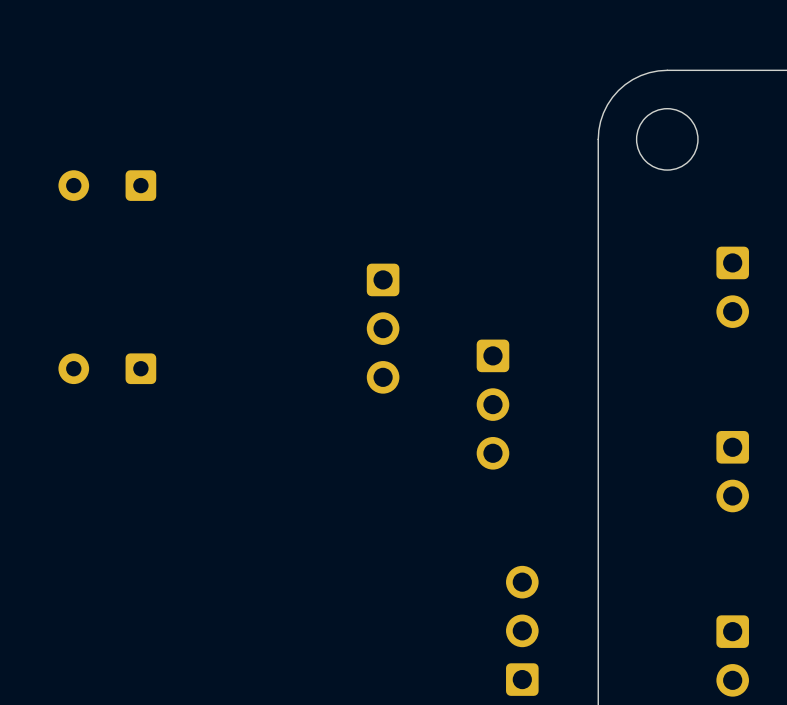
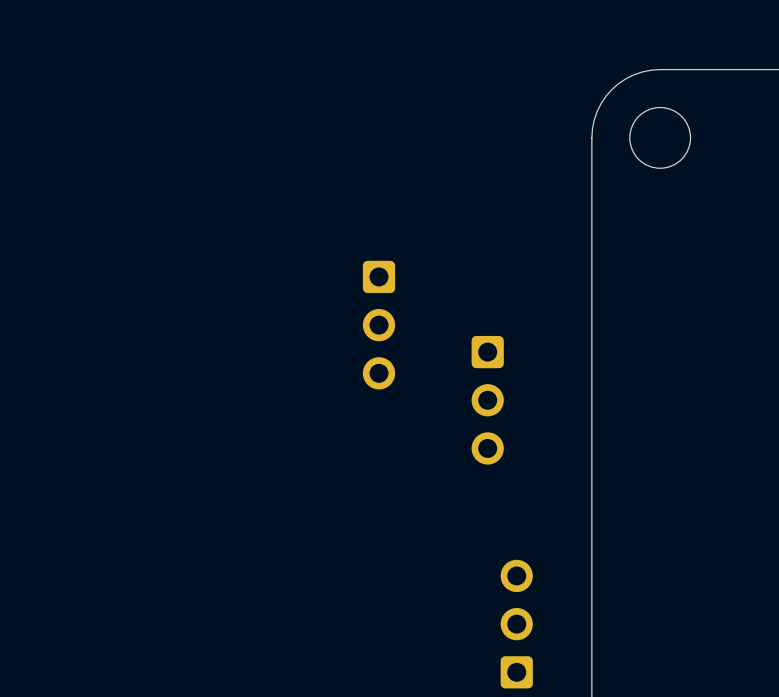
part: (107, 185) -> none
part: (732, 287) -> none
part: (107, 368) -> none
part: (732, 471) -> none
part: (732, 655) -> none

